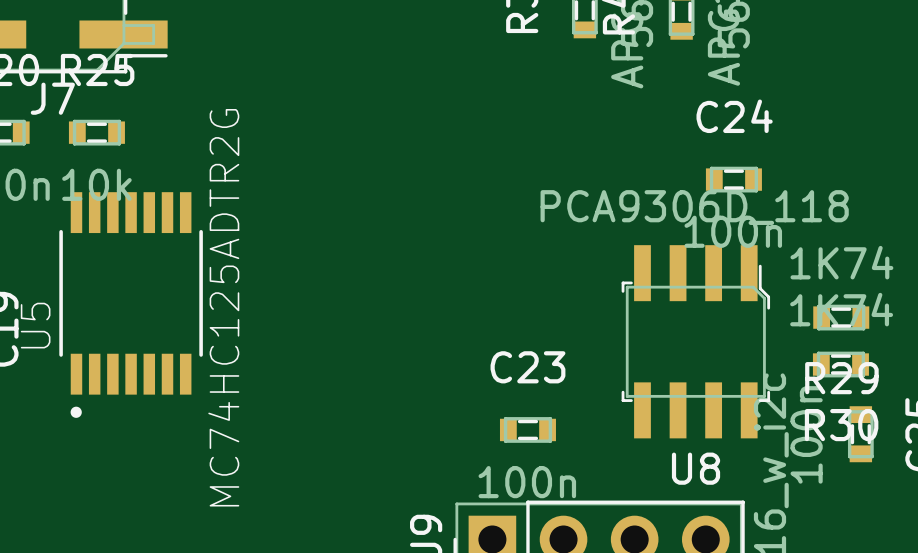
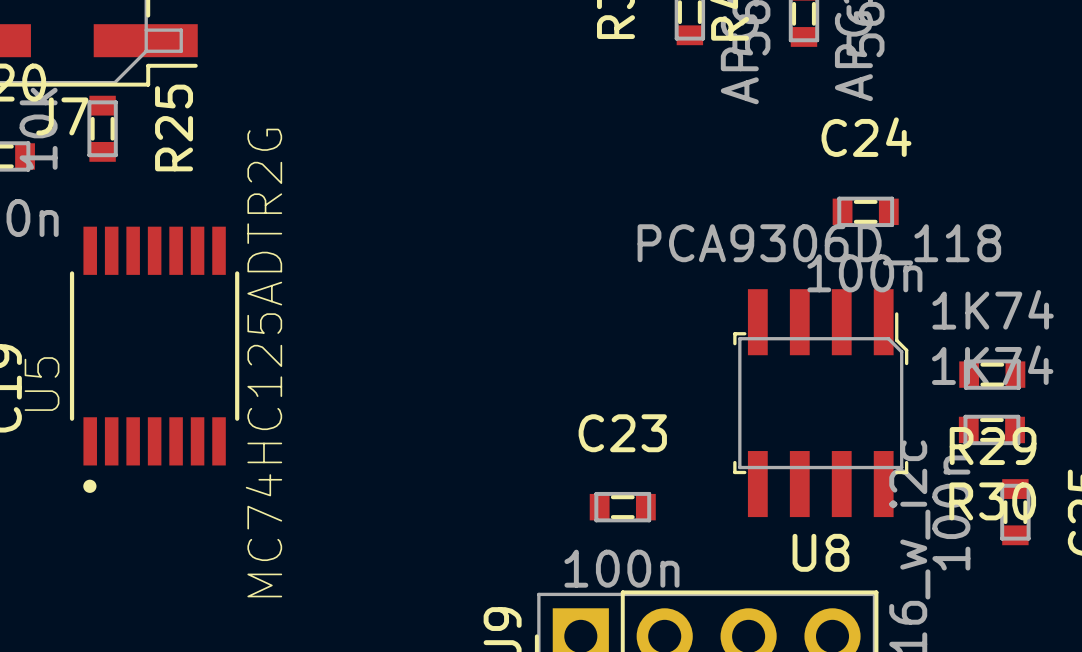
R25 rotation: 0° (96, 132) -> 90° clockwise (102, 128)

